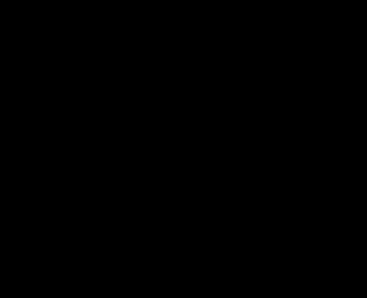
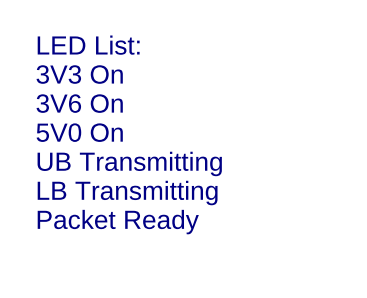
text: none -> LED List: (88, 45)
text: none -> 3V3 On (79, 74)
text: none -> 3V6 On (79, 103)
text: none -> 5V0 On (79, 132)
text: none -> UB Transmitting (129, 163)
text: none -> LB Transmitting (127, 193)
text: none -> Packet Ready (118, 222)

